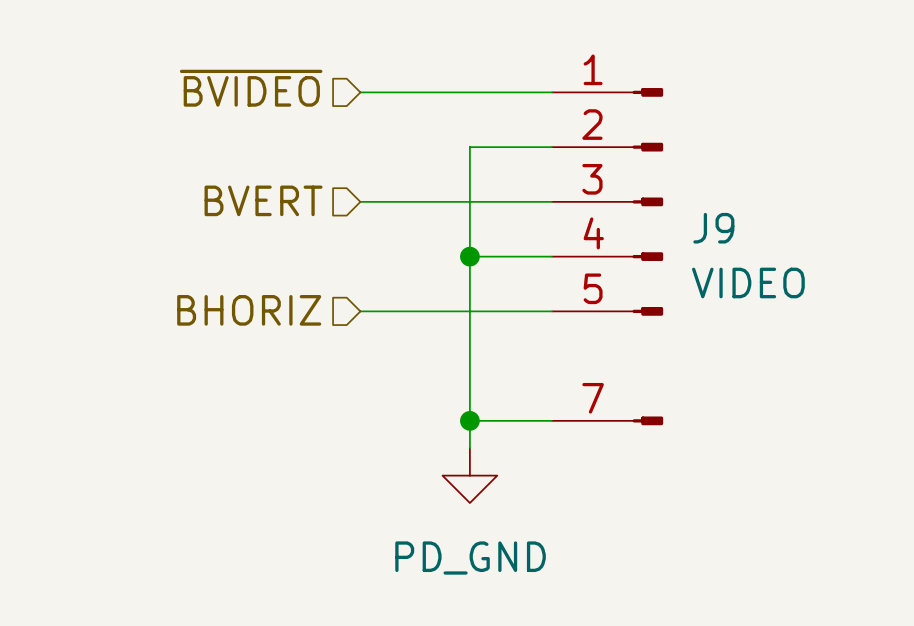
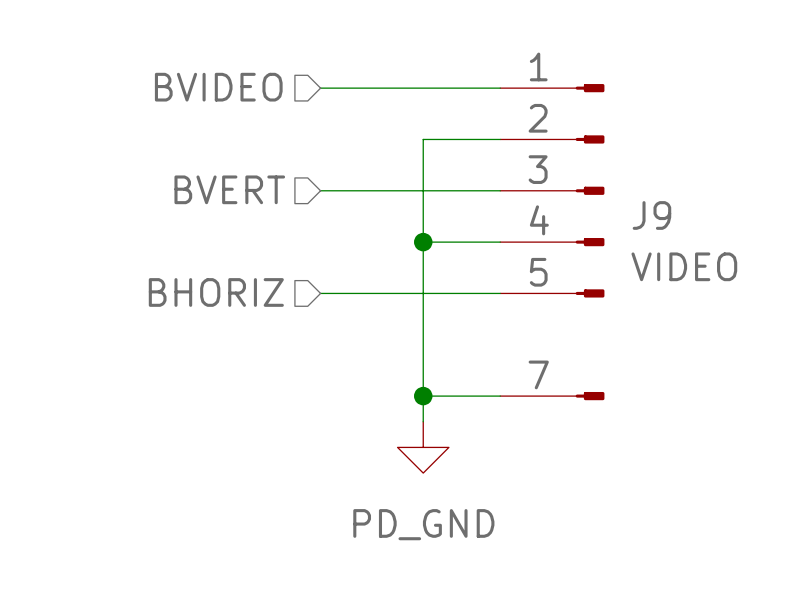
hierarchical label: ~{BVIDEO} (251, 88) -> BVIDEO (218, 87)

